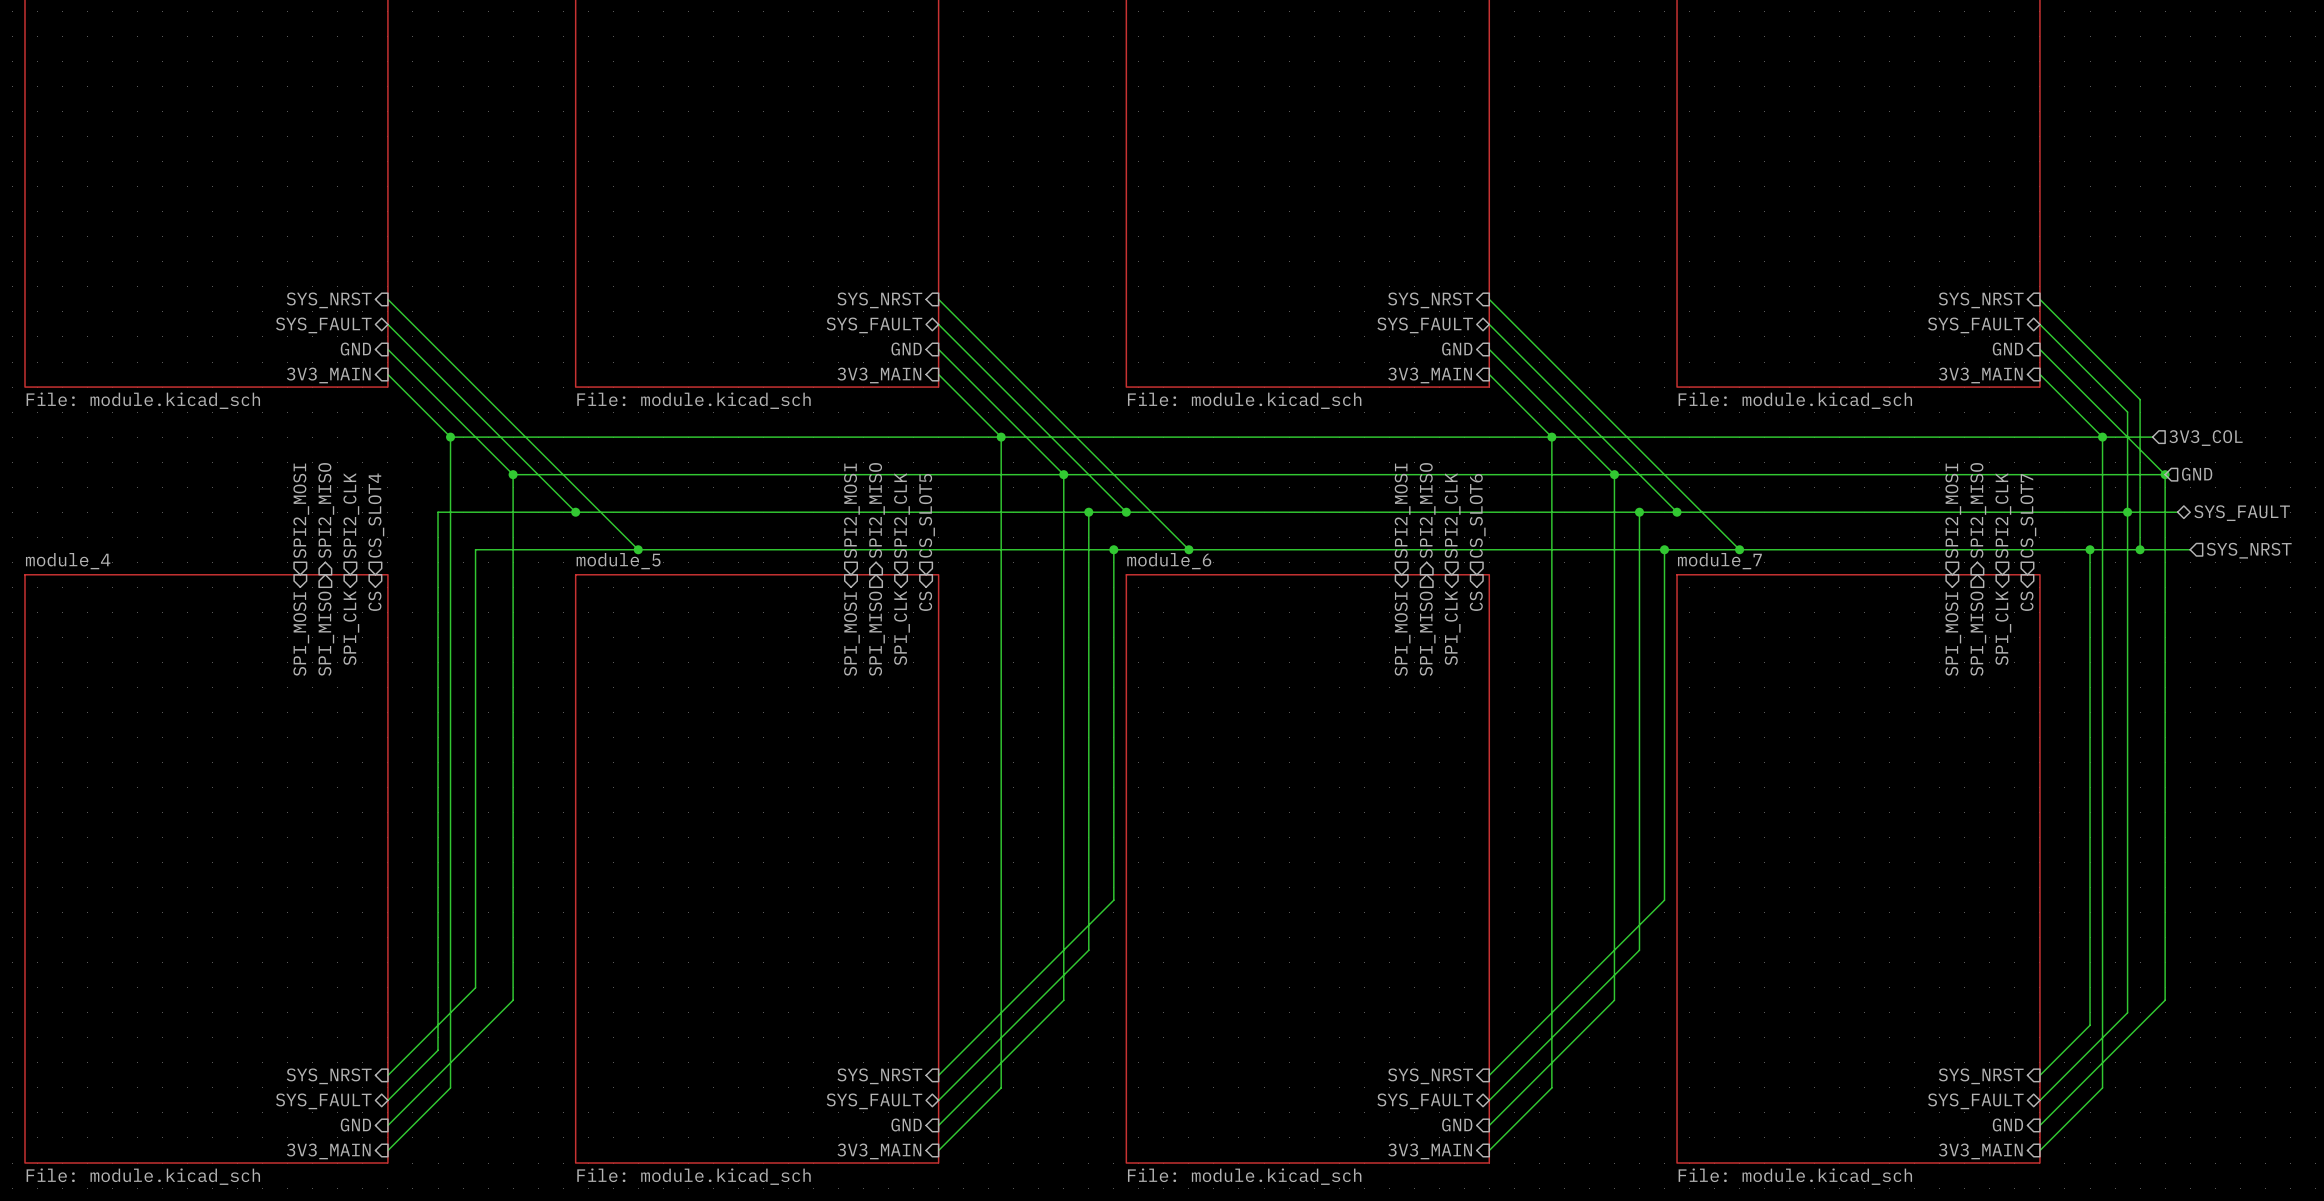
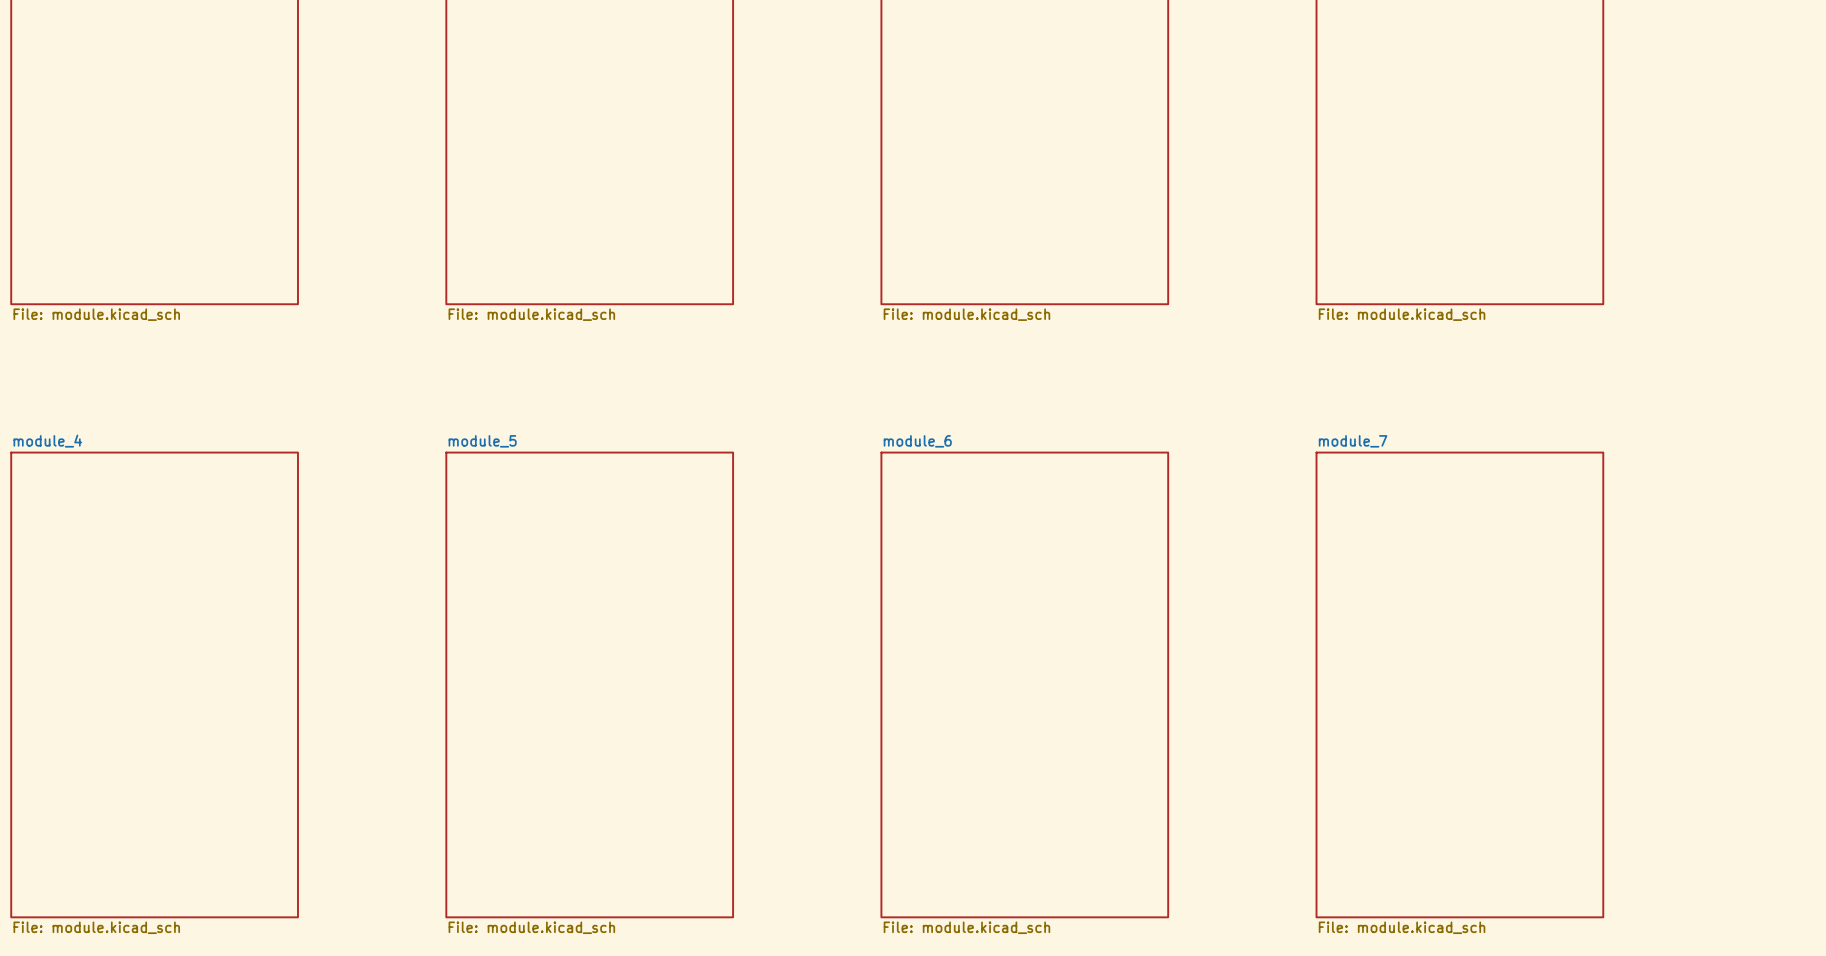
wire: (387, 299) (638, 549) -> none
wire: (938, 299) (1188, 549) -> none
wire: (1489, 299) (1739, 549) -> none
wire: (2039, 299) (2140, 399) (2140, 549) -> none
sheet pin: SYS_NRST (329, 300) -> none
sheet pin: SYS_NRST (879, 300) -> none
sheet pin: SYS_NRST (1430, 300) -> none
sheet pin: SYS_NRST (1981, 300) -> none
wire: (387, 324) (575, 512) -> none
wire: (938, 324) (1126, 512) -> none
wire: (1489, 324) (1677, 512) -> none
wire: (2039, 324) (2127, 412) (2127, 1012) (2039, 1100) -> none
sheet pin: SYS_FAULT (323, 325) -> none
sheet pin: SYS_FAULT (874, 325) -> none
sheet pin: SYS_FAULT (1425, 325) -> none
sheet pin: SYS_FAULT (1975, 325) -> none
sheet pin: GND (355, 349) -> none
wire: (387, 349) (513, 474) -> none
sheet pin: GND (906, 349) -> none
wire: (938, 349) (1063, 474) (1063, 1000) (938, 1125) -> none
sheet pin: GND (1457, 349) -> none
wire: (1489, 349) (1614, 474) (1614, 1000) (1489, 1125) -> none
sheet pin: GND (2007, 349) -> none
wire: (2039, 349) (2165, 474) -> none
wire: (387, 374) (450, 437) -> none
wire: (938, 374) (1001, 437) (1001, 1087) (938, 1150) -> none
wire: (1489, 374) (1551, 437) (1551, 1087) (1489, 1150) -> none
wire: (2039, 374) (2102, 437) (2102, 1087) (2039, 1150) -> none
sheet pin: 3V3_MAIN (328, 375) -> none
sheet pin: 3V3_MAIN (879, 375) -> none
sheet pin: 3V3_MAIN (1430, 375) -> none
sheet pin: 3V3_MAIN (1980, 375) -> none
wire: (450, 437) (2152, 437) -> none
wire: (450, 437) (450, 1087) (387, 1150) -> none
junction: (450, 437) -> none
junction: (1001, 437) -> none
junction: (1551, 437) -> none
junction: (2102, 437) -> none
hierarchical label: 3V3_COL (2205, 438) -> none
wire: (513, 474) (2165, 474) -> none
wire: (513, 474) (513, 1000) (387, 1125) -> none
junction: (513, 474) -> none
junction: (1063, 474) -> none
junction: (1614, 474) -> none
wire: (2165, 474) (2165, 1000) (2039, 1125) -> none
junction: (2165, 474) -> none
hierarchical label: GND (2197, 474) -> none
hierarchical label: SPI2_MOSI (301, 510) -> none
hierarchical label: SPI2_MISO (326, 510) -> none
hierarchical label: SPI2_MOSI (851, 510) -> none
hierarchical label: SPI2_MISO (876, 510) -> none
hierarchical label: SPI2_MOSI (1402, 510) -> none
hierarchical label: SPI2_MISO (1427, 510) -> none
hierarchical label: SPI2_MOSI (1953, 510) -> none
hierarchical label: SPI2_MISO (1978, 510) -> none
junction: (575, 512) -> none
wire: (1088, 512) (1088, 950) (938, 1100) -> none
junction: (1088, 512) -> none
junction: (1126, 512) -> none
wire: (1639, 512) (1639, 950) (1489, 1100) -> none
junction: (1639, 512) -> none
junction: (1677, 512) -> none
junction: (2127, 512) -> none
wire: (2177, 512) (438, 512) (438, 1050) (387, 1100) -> none
hierarchical label: SYS_FAULT (2242, 513) -> none
hierarchical label: SPI2_CLK (351, 515) -> none
hierarchical label: CS_SLOT4 (376, 515) -> none
hierarchical label: SPI2_CLK (902, 515) -> none
hierarchical label: CS_SLOT5 (927, 515) -> none
hierarchical label: SPI2_CLK (1452, 515) -> none
hierarchical label: CS_SLOT6 (1477, 515) -> none
hierarchical label: SPI2_CLK (2003, 515) -> none
hierarchical label: CS_SLOT7 (2028, 515) -> none
junction: (638, 549) -> none
wire: (1113, 549) (1113, 900) (938, 1075) -> none
junction: (1113, 549) -> none
junction: (1188, 549) -> none
wire: (1664, 549) (1664, 900) (1489, 1075) -> none
junction: (1664, 549) -> none
junction: (1739, 549) -> none
wire: (2090, 549) (2090, 1025) (2039, 1075) -> none
junction: (2090, 549) -> none
junction: (2140, 549) -> none
wire: (2190, 549) (475, 549) (475, 987) (387, 1075) -> none
hierarchical label: SYS_NRST (2249, 550) -> none
sheet pin: CS (374, 601) -> none
sheet pin: CS (925, 601) -> none
sheet pin: CS (1476, 601) -> none
sheet pin: CS (2026, 601) -> none
sheet pin: SPI_CLK (351, 628) -> none
sheet pin: SPI_CLK (902, 628) -> none
sheet pin: SPI_CLK (1452, 628) -> none
sheet pin: SPI_CLK (2003, 628) -> none
sheet pin: SPI_MISO (326, 633) -> none
sheet pin: SPI_MISO (876, 633) -> none
sheet pin: SPI_MISO (1427, 633) -> none
sheet pin: SPI_MISO (1978, 633) -> none
sheet pin: SPI_MOSI (301, 634) -> none
sheet pin: SPI_MOSI (851, 634) -> none
sheet pin: SPI_MOSI (1402, 634) -> none
sheet pin: SPI_MOSI (1953, 634) -> none
sheet pin: SYS_NRST (329, 1076) -> none
sheet pin: SYS_NRST (879, 1076) -> none
sheet pin: SYS_NRST (1430, 1076) -> none
sheet pin: SYS_NRST (1981, 1076) -> none
sheet pin: SYS_FAULT (323, 1101) -> none
sheet pin: SYS_FAULT (874, 1101) -> none
sheet pin: SYS_FAULT (1425, 1101) -> none
sheet pin: SYS_FAULT (1975, 1101) -> none
sheet pin: GND (355, 1124) -> none
sheet pin: GND (906, 1124) -> none
sheet pin: GND (1457, 1124) -> none
sheet pin: GND (2007, 1124) -> none
sheet pin: 3V3_MAIN (328, 1151) -> none
sheet pin: 3V3_MAIN (879, 1151) -> none
sheet pin: 3V3_MAIN (1430, 1151) -> none
sheet pin: 3V3_MAIN (1980, 1151) -> none

